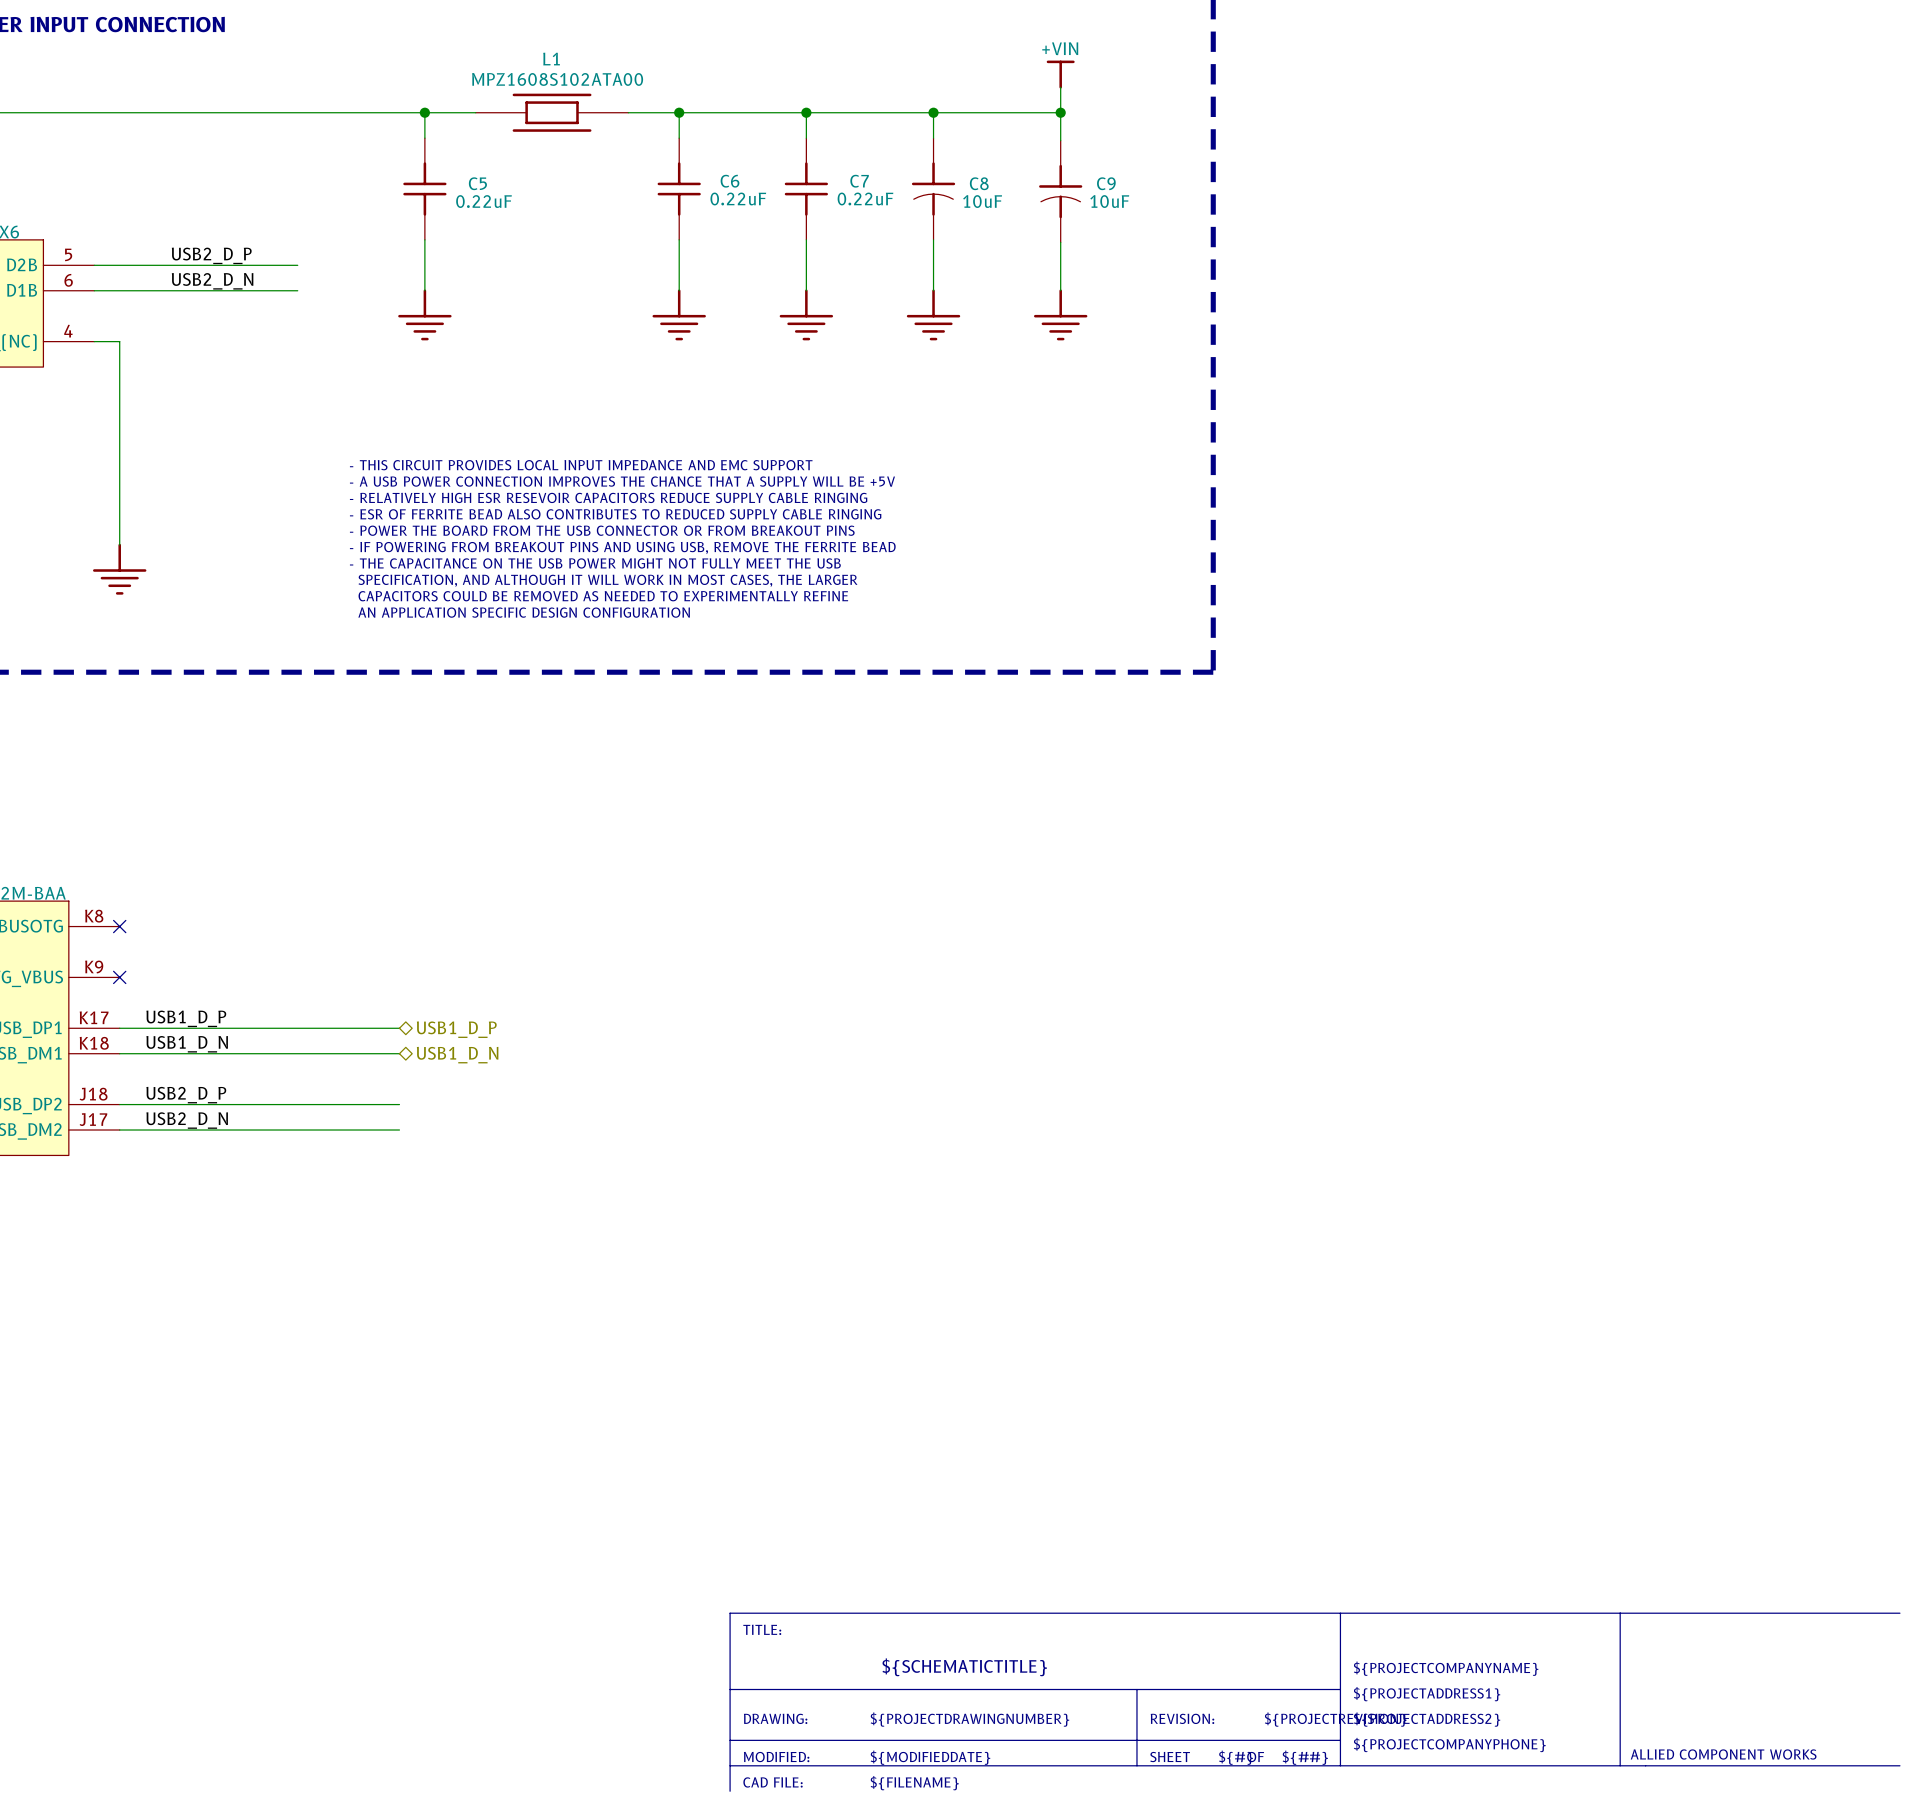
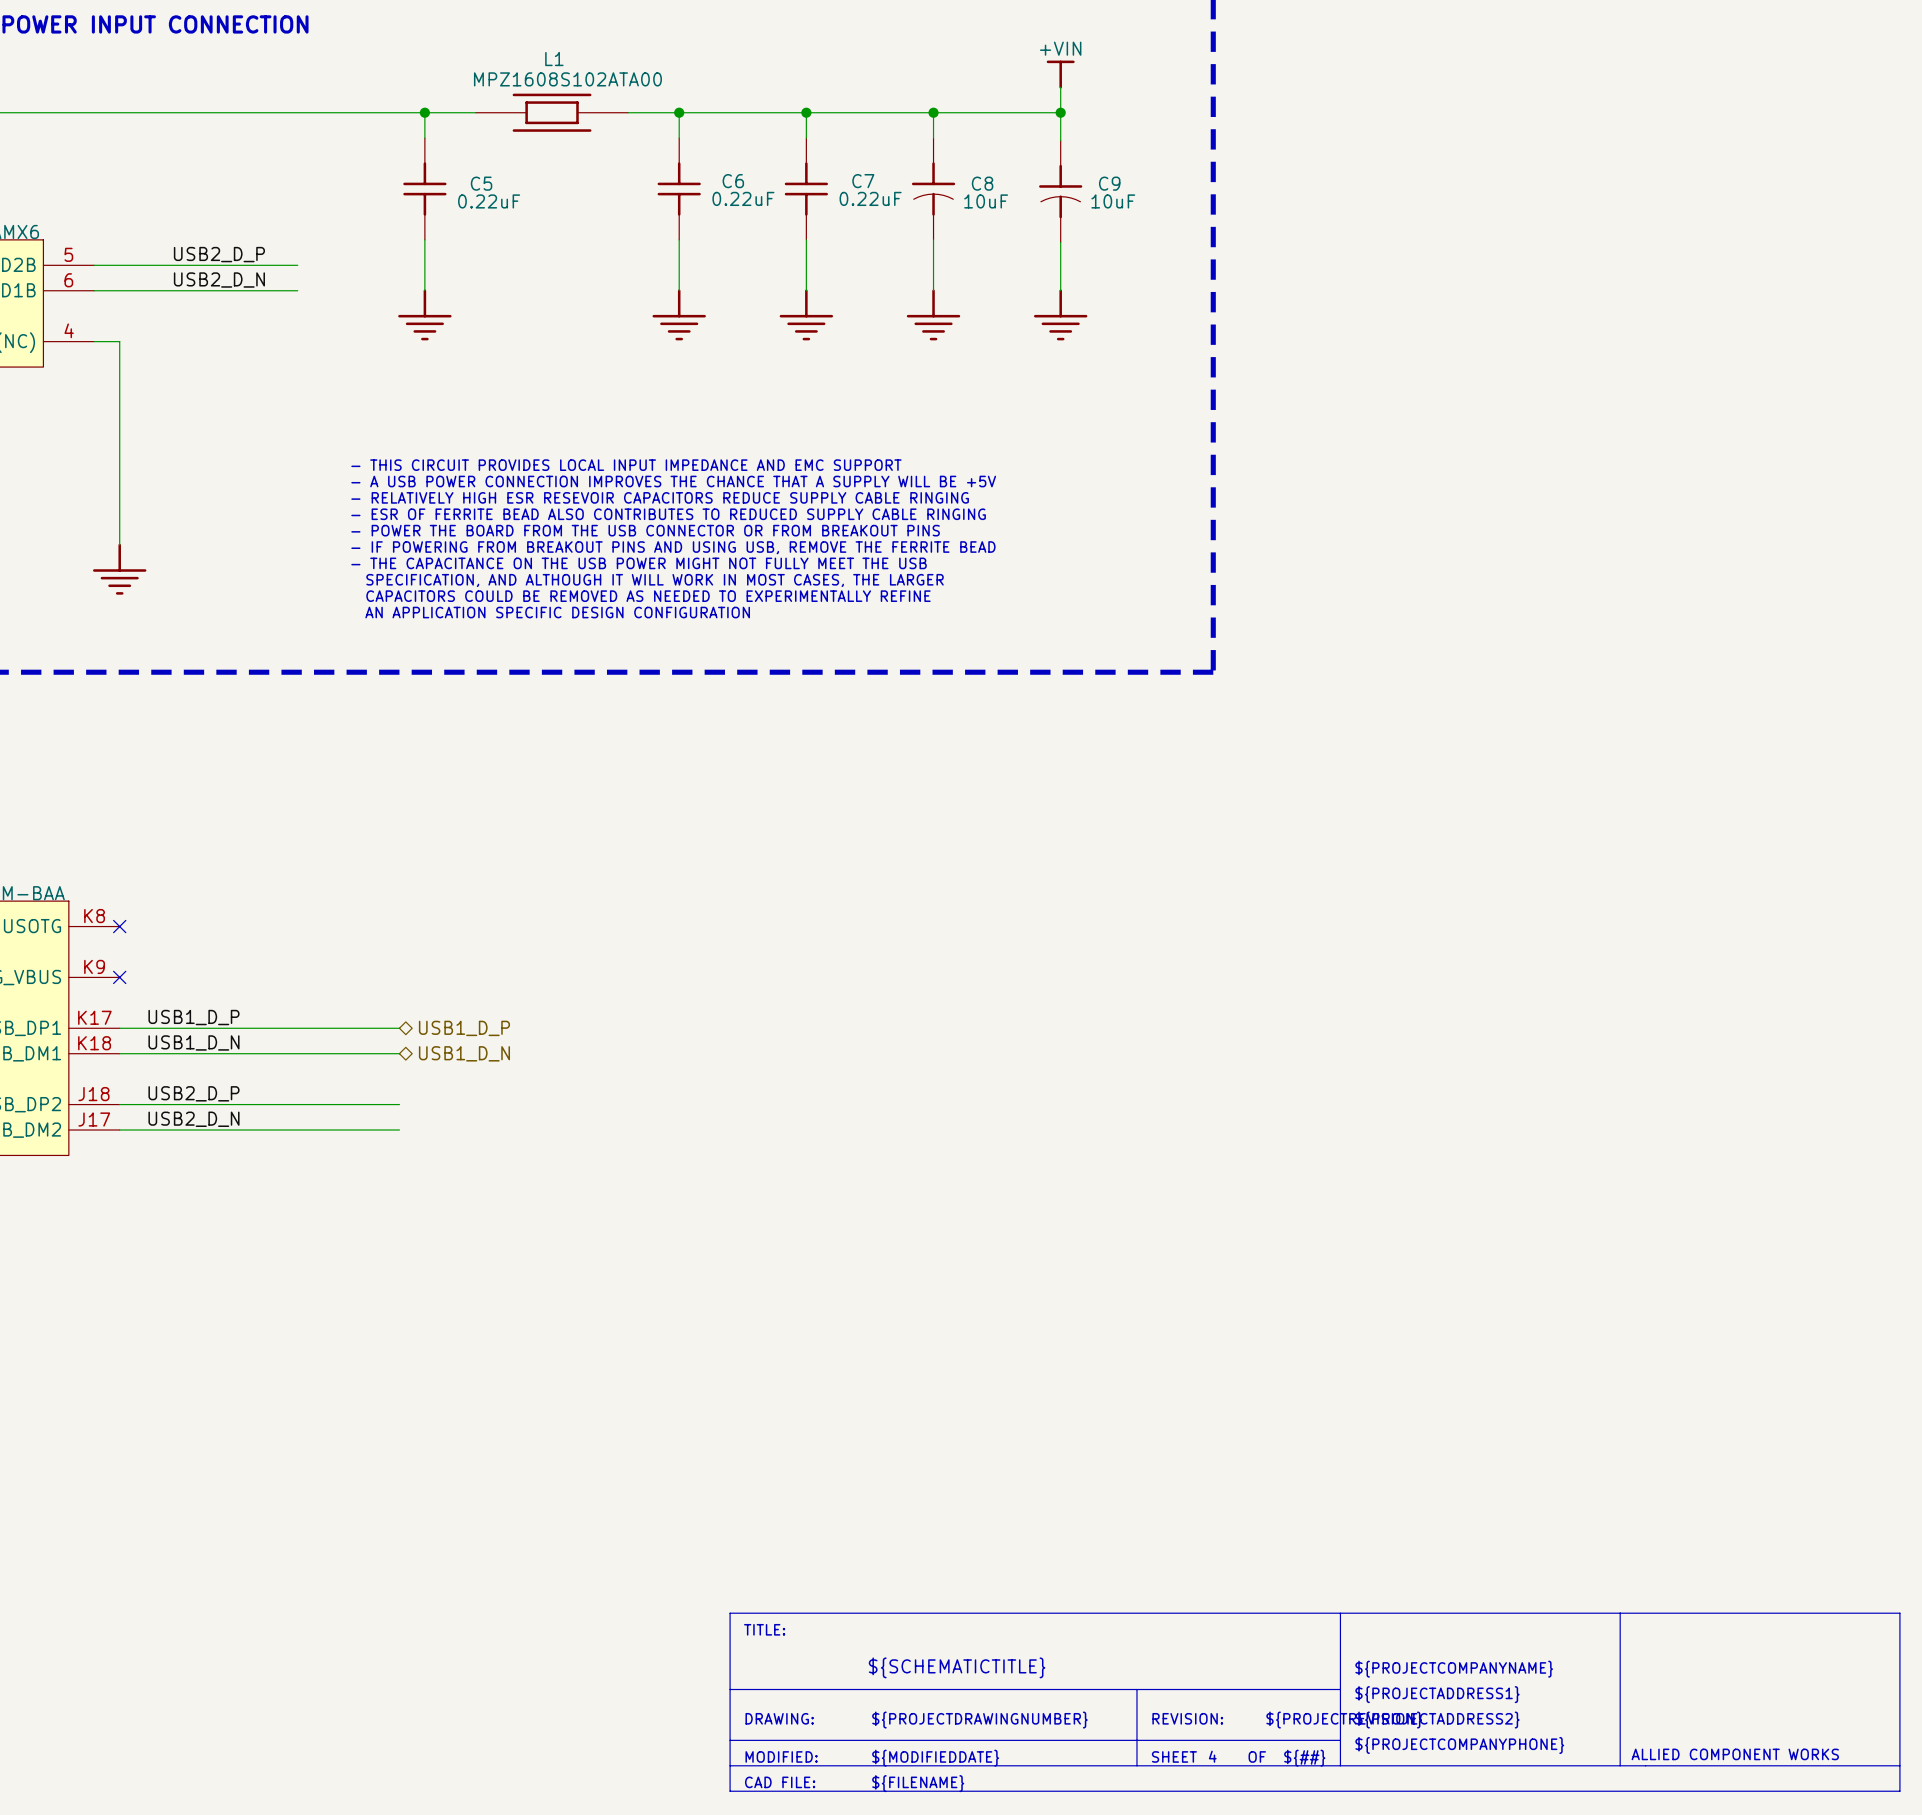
line: none -> (1899, 1613) (1899, 1791) (730, 1791)
text: ${#} (1236, 1757) -> 4 (1212, 1756)

